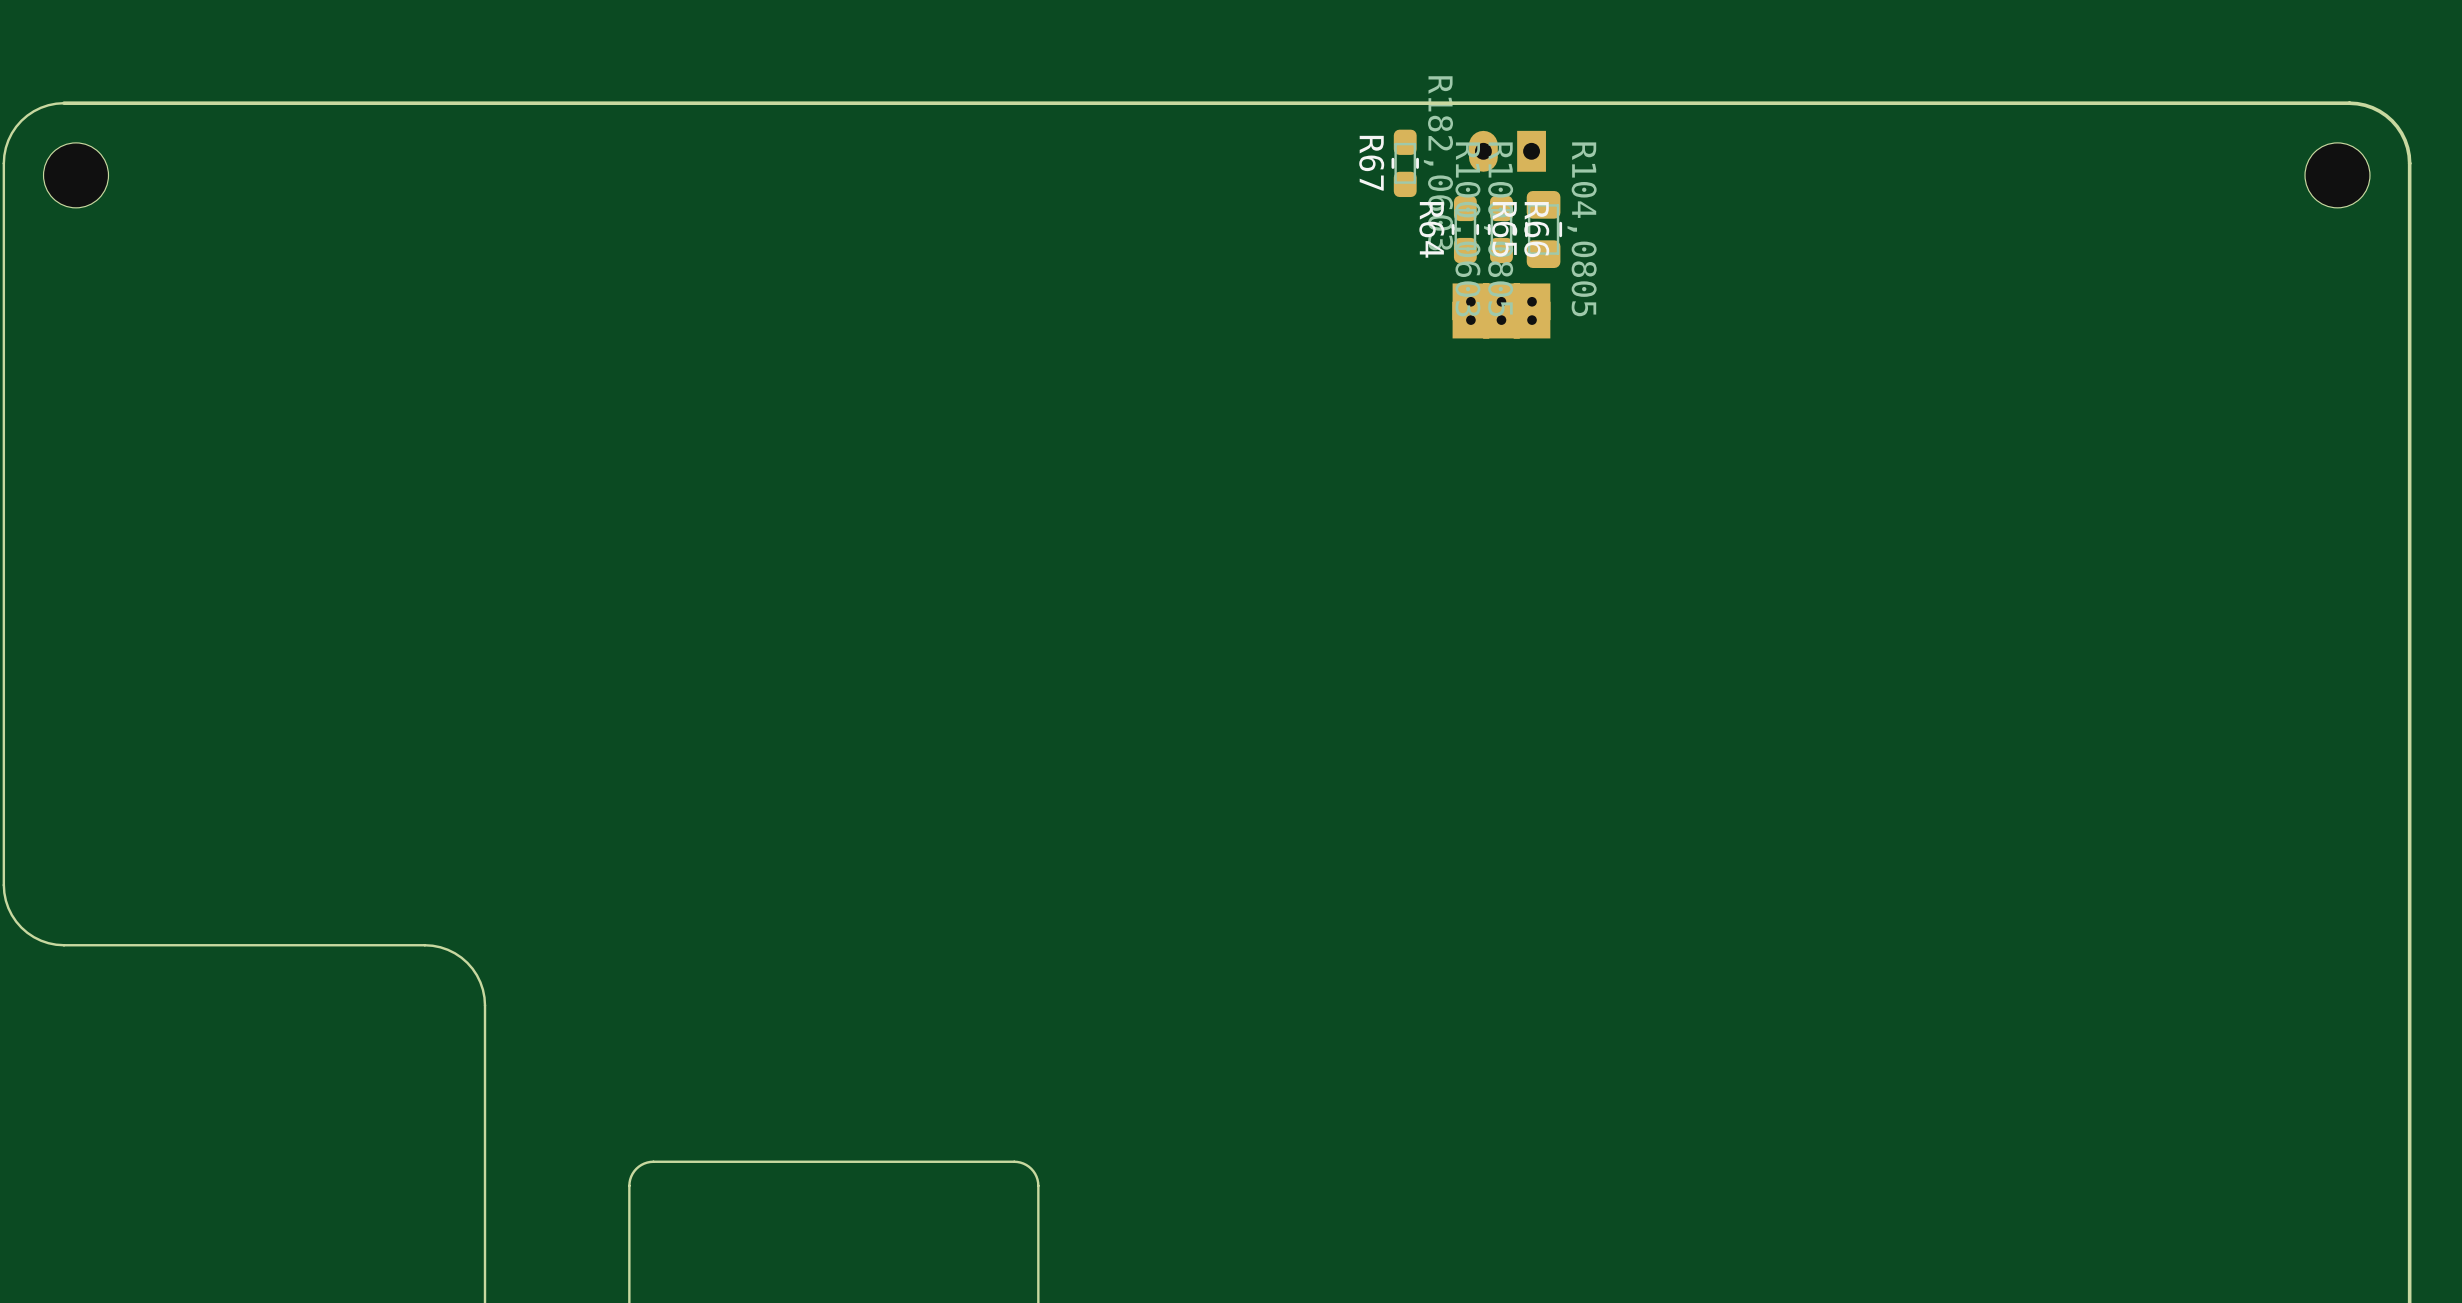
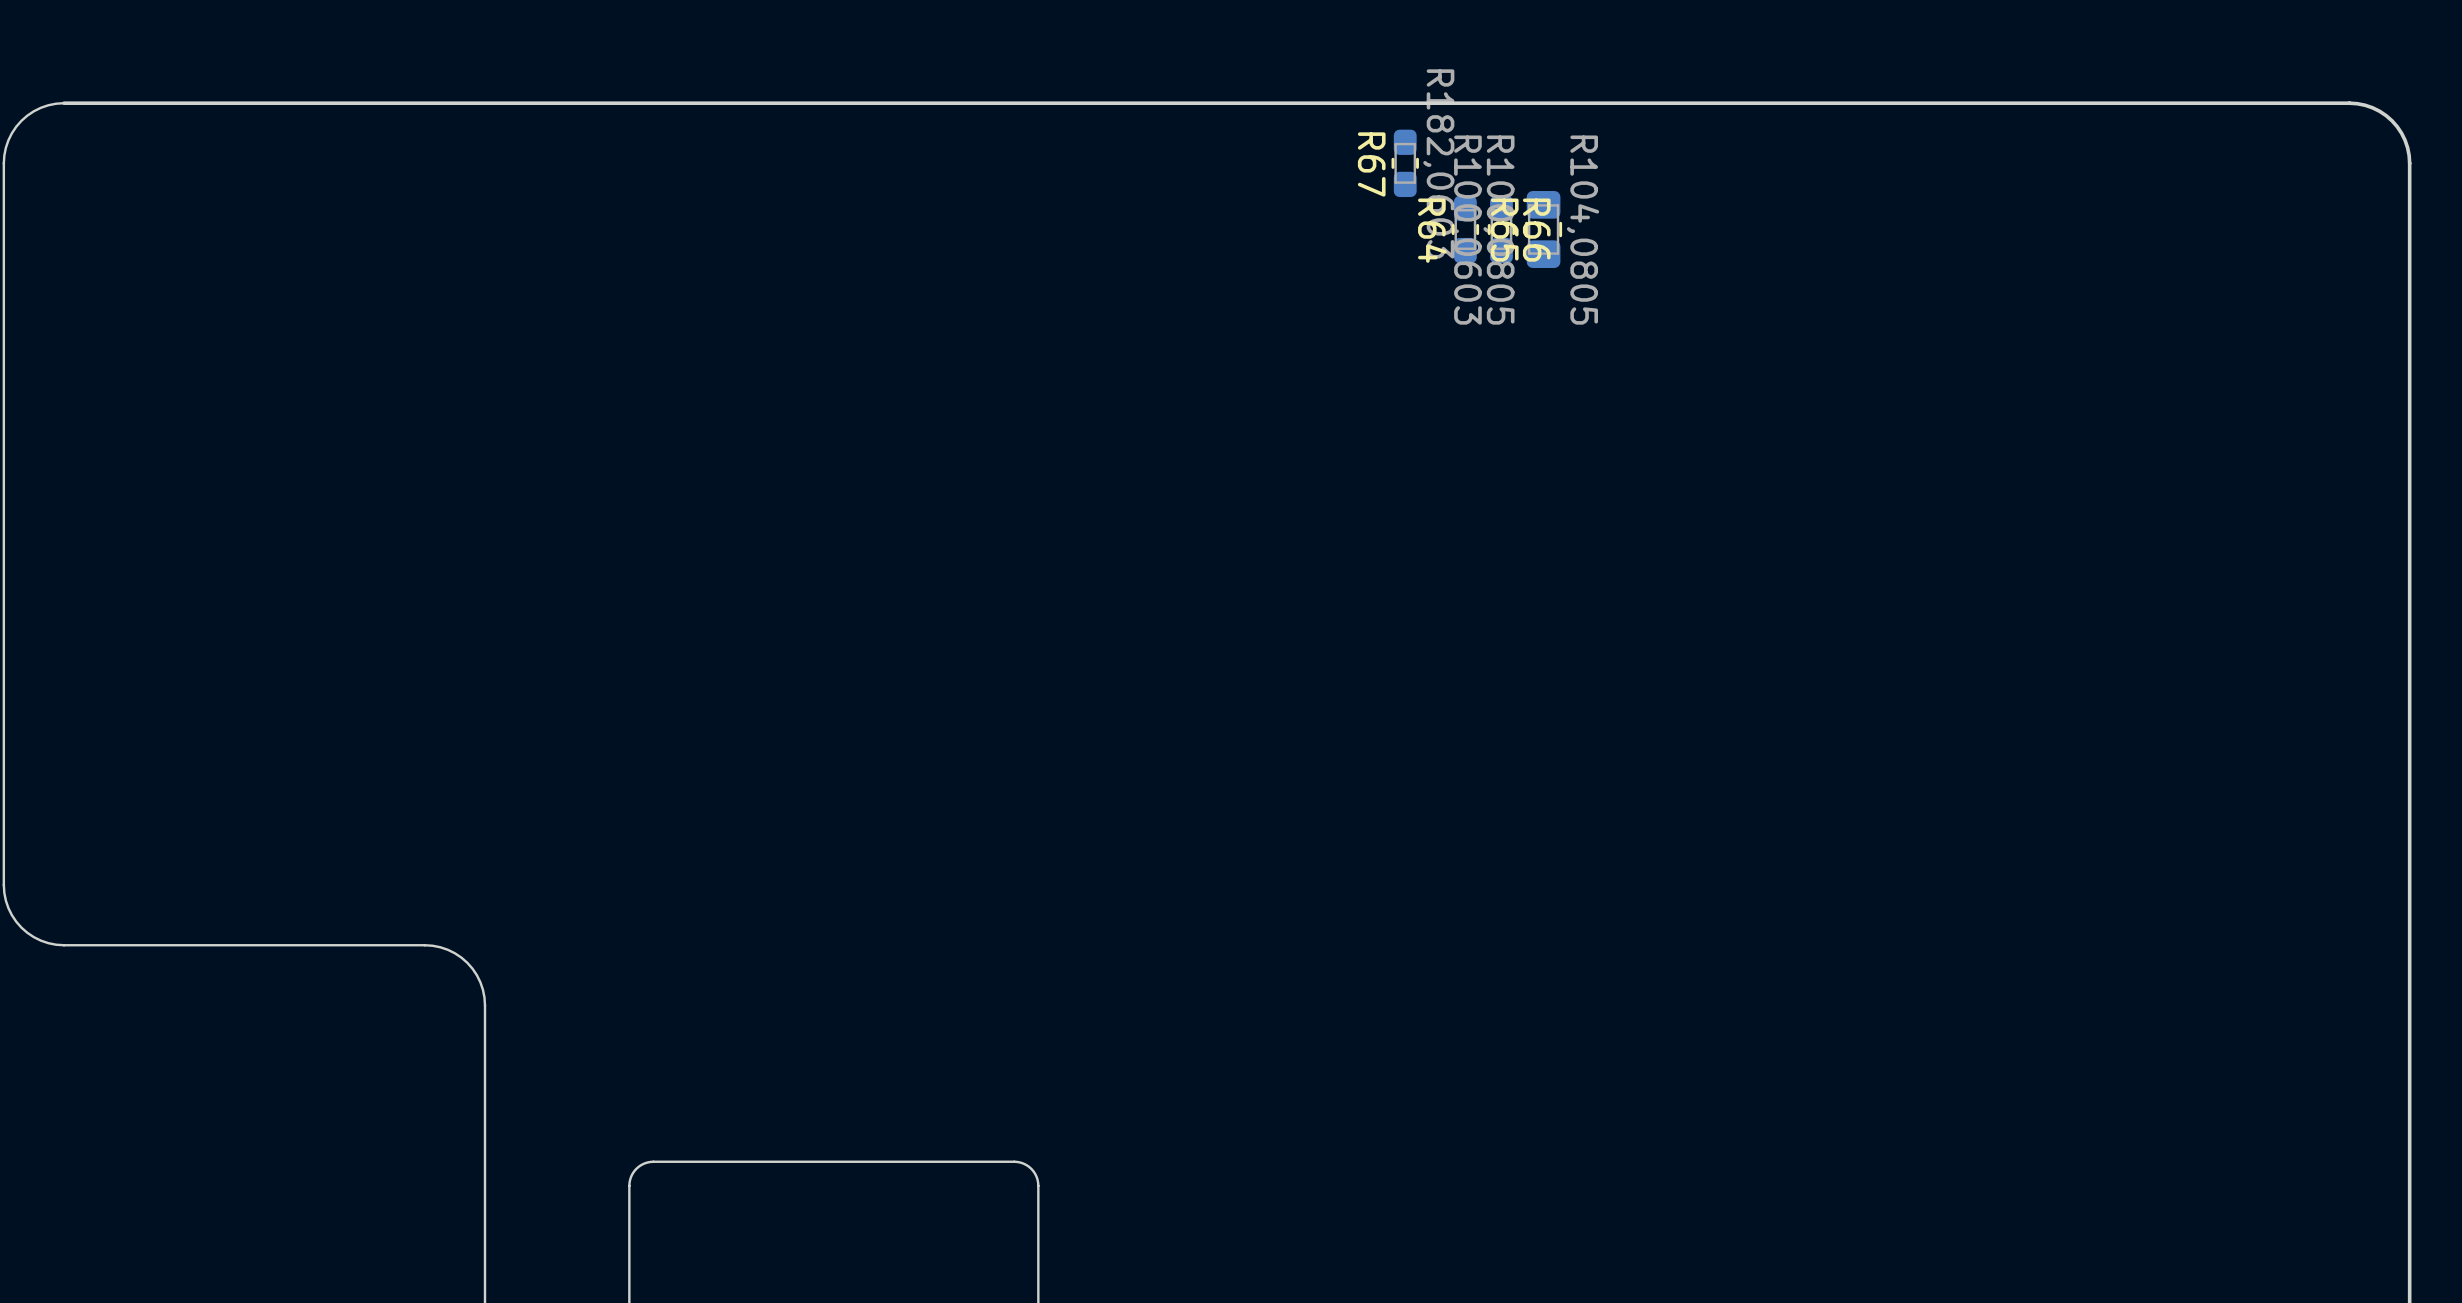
part: (1507, 151) -> none
part: (76, 175) -> none
part: (2337, 175) -> none
part: (1501, 310) -> none

